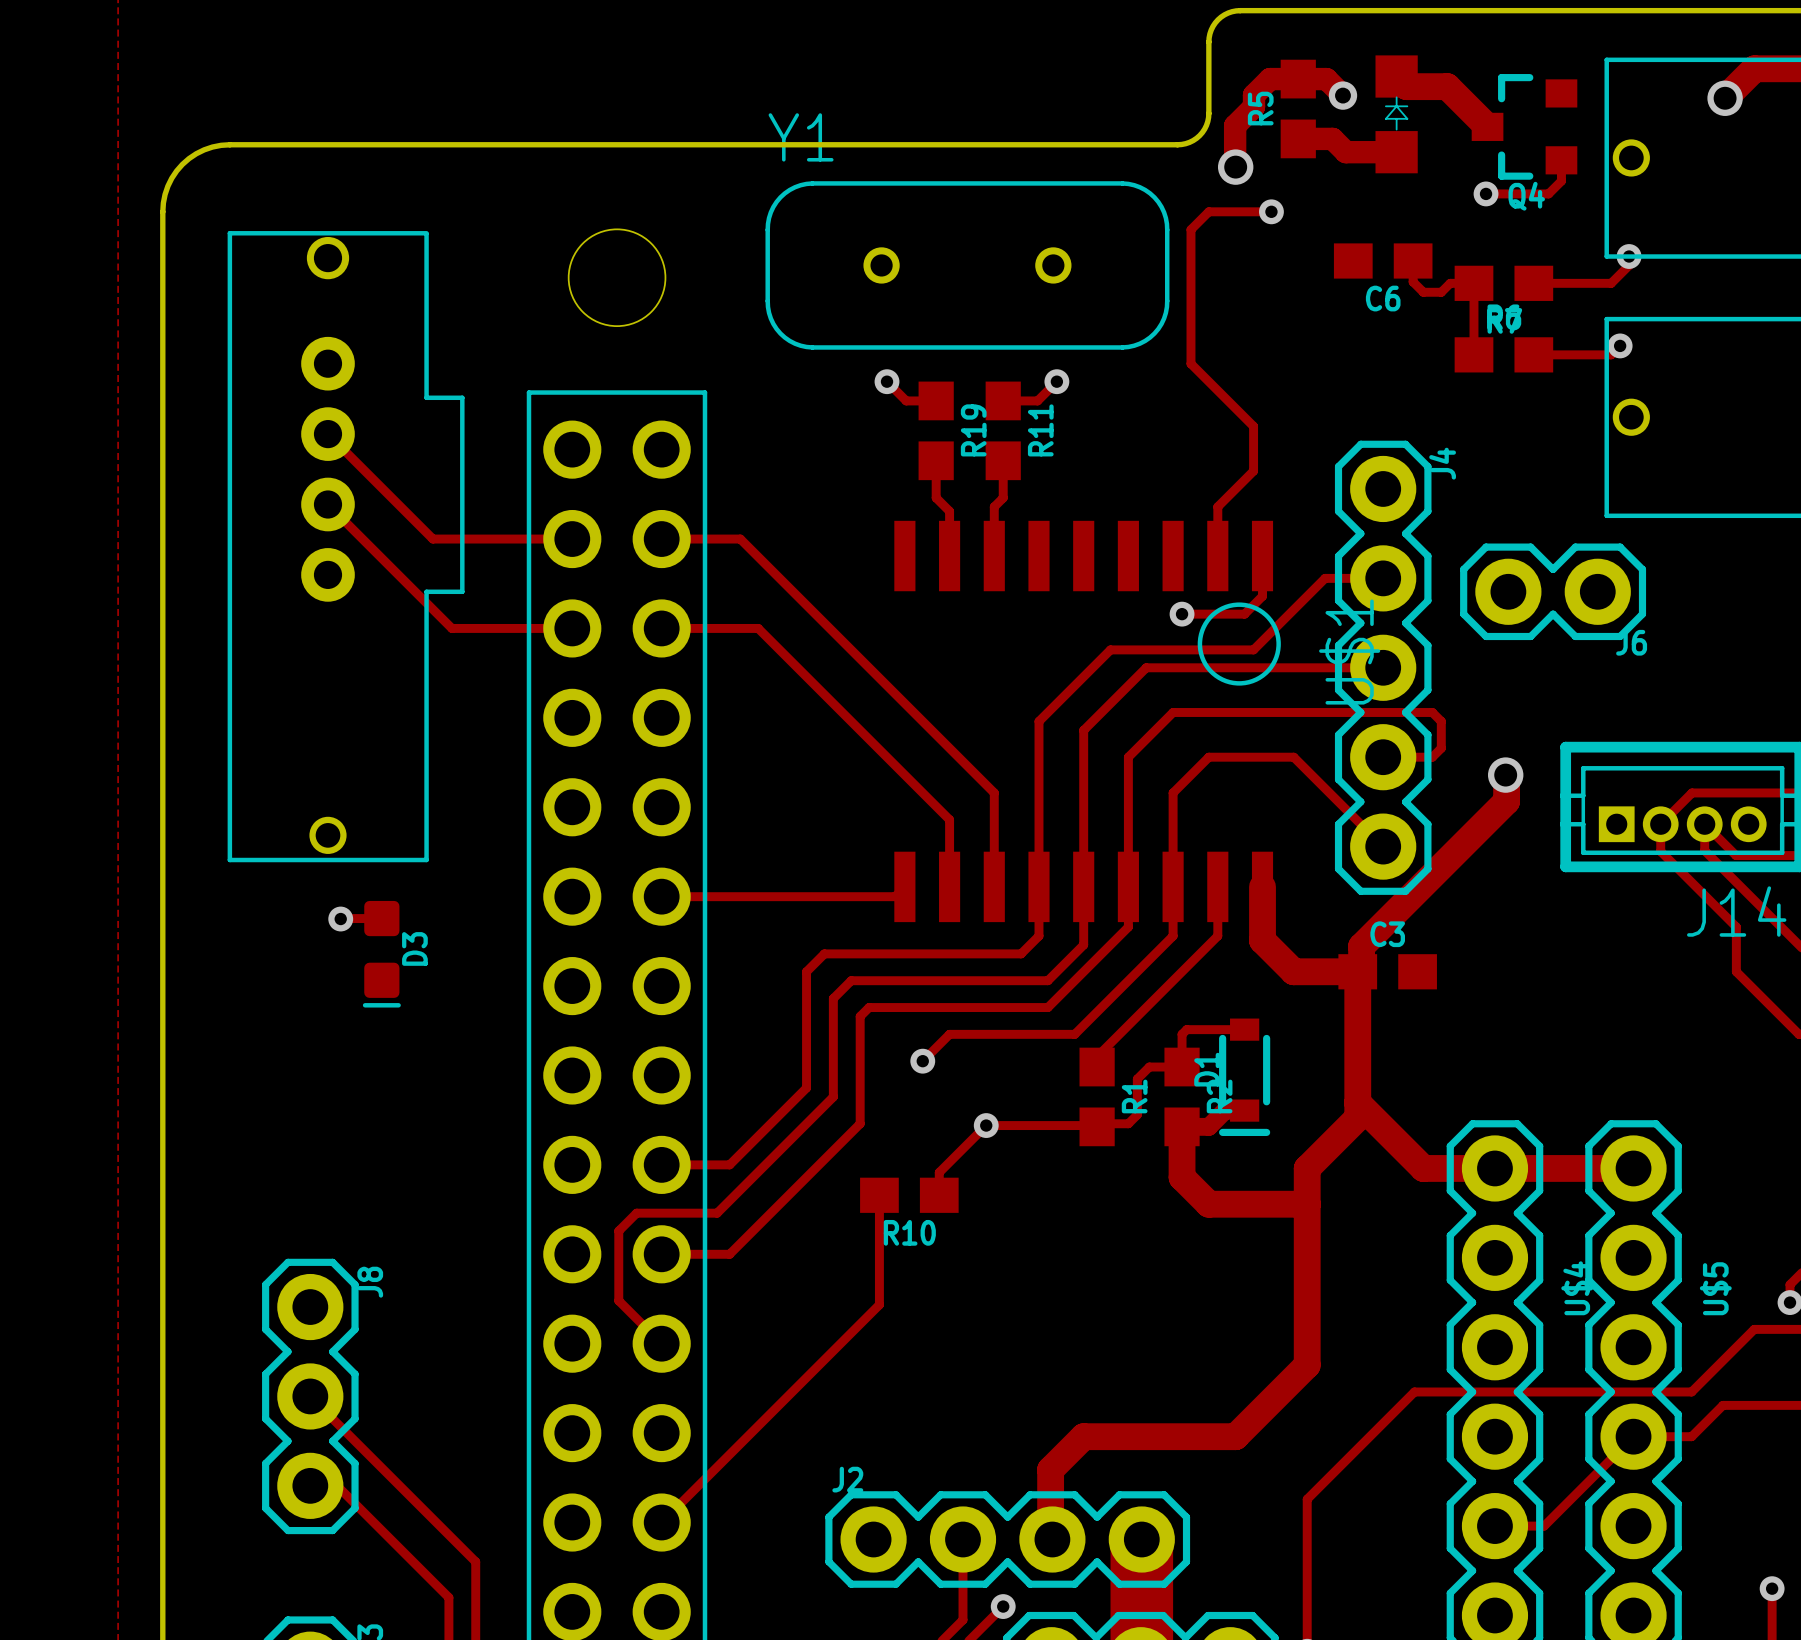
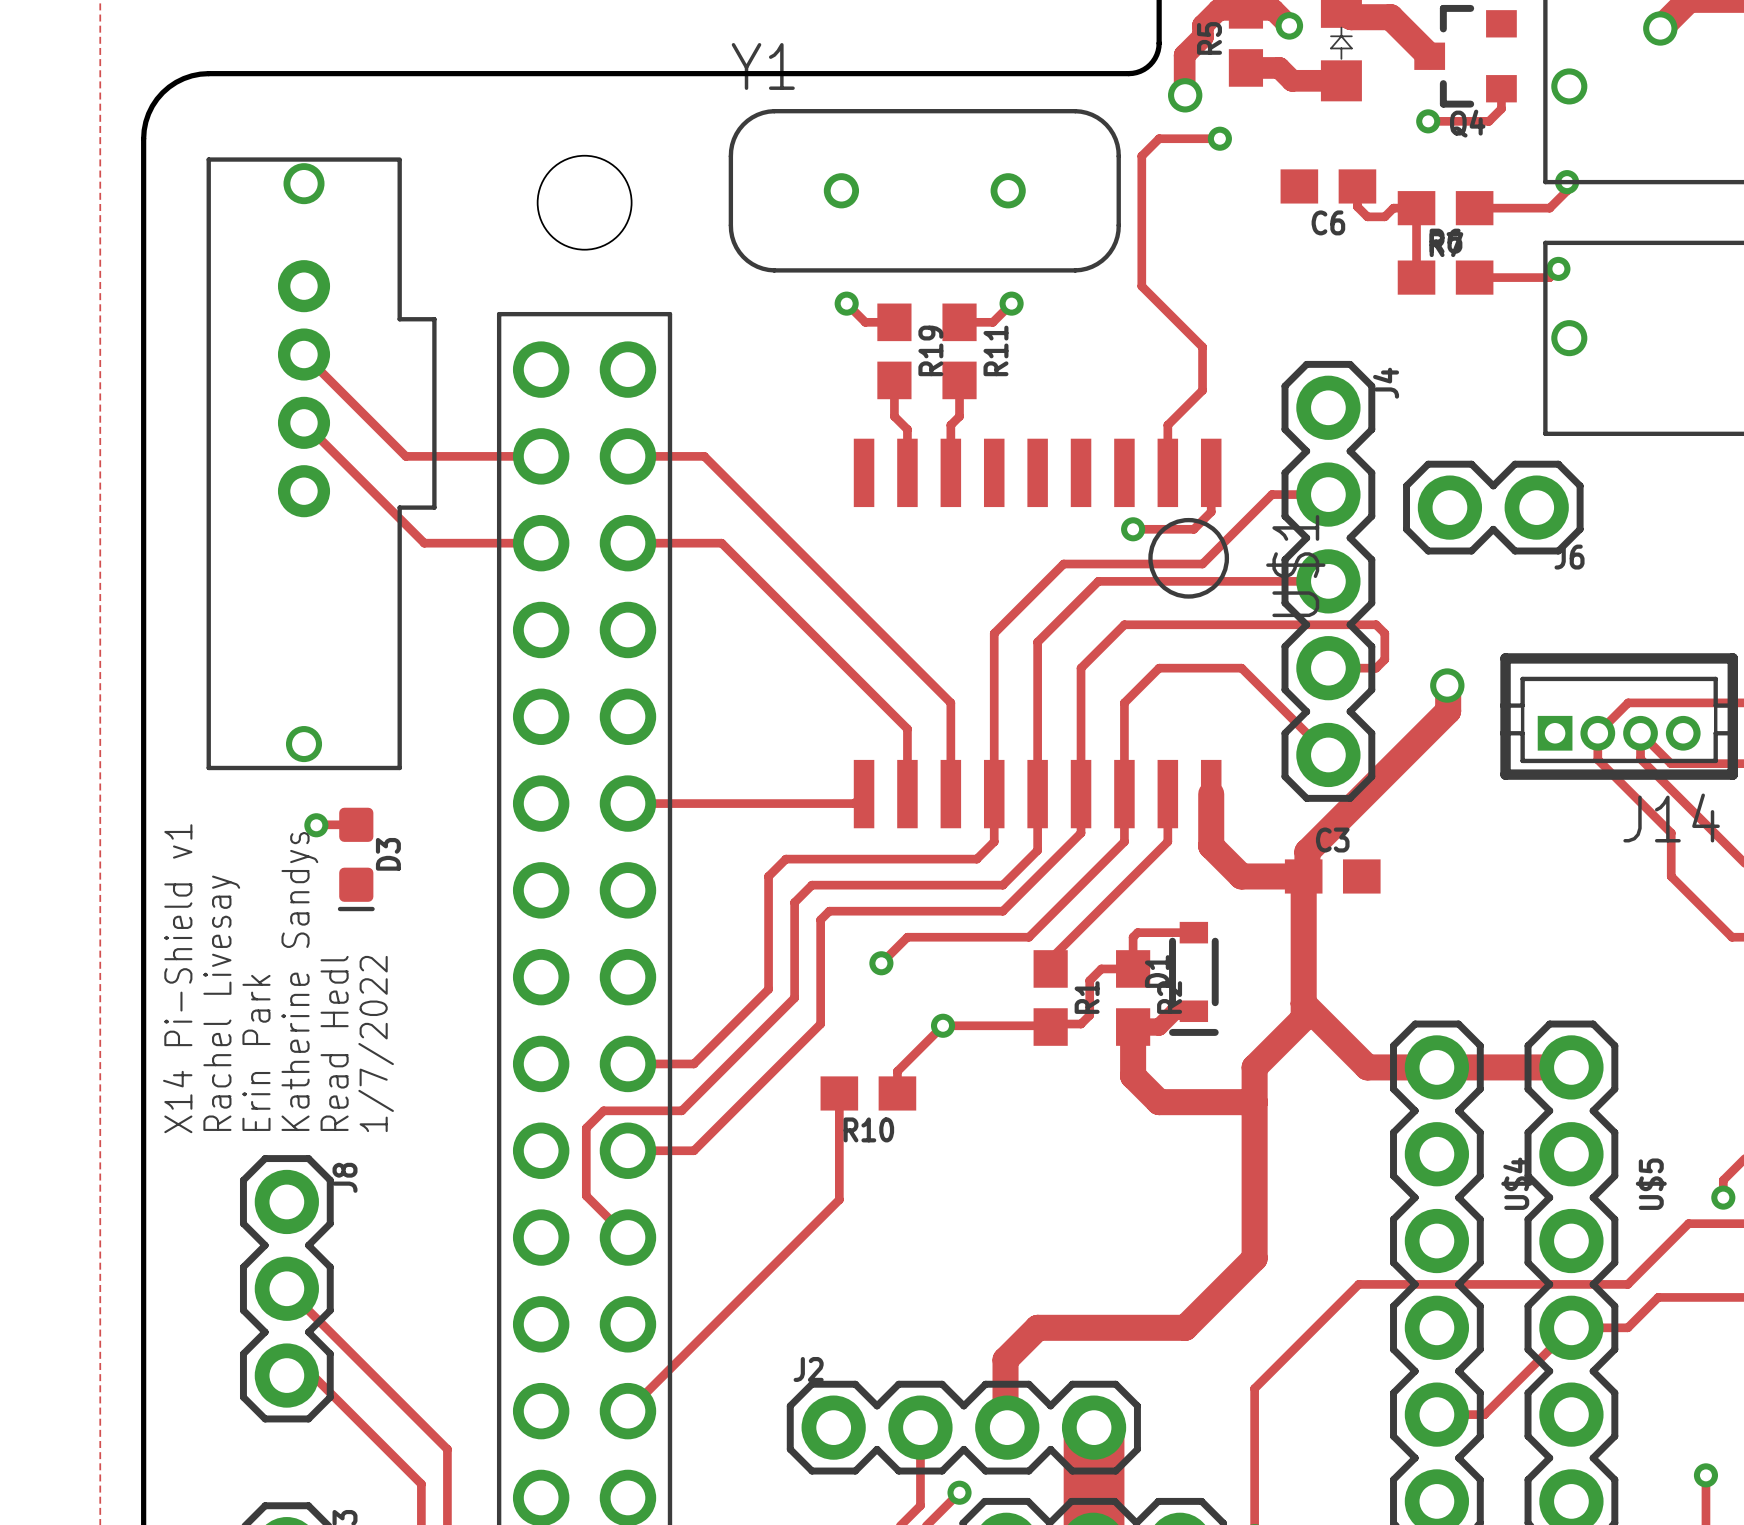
text: none -> X14 Pi-Shield v1 (177, 978)
text: none -> Katherine Sandys (299, 981)
text: none -> Rachel Livesay (221, 1003)
text: none -> Read Hedl (334, 1043)
text: none -> 1/7/2022 (376, 1043)
text: none -> Erin Park (256, 1052)

